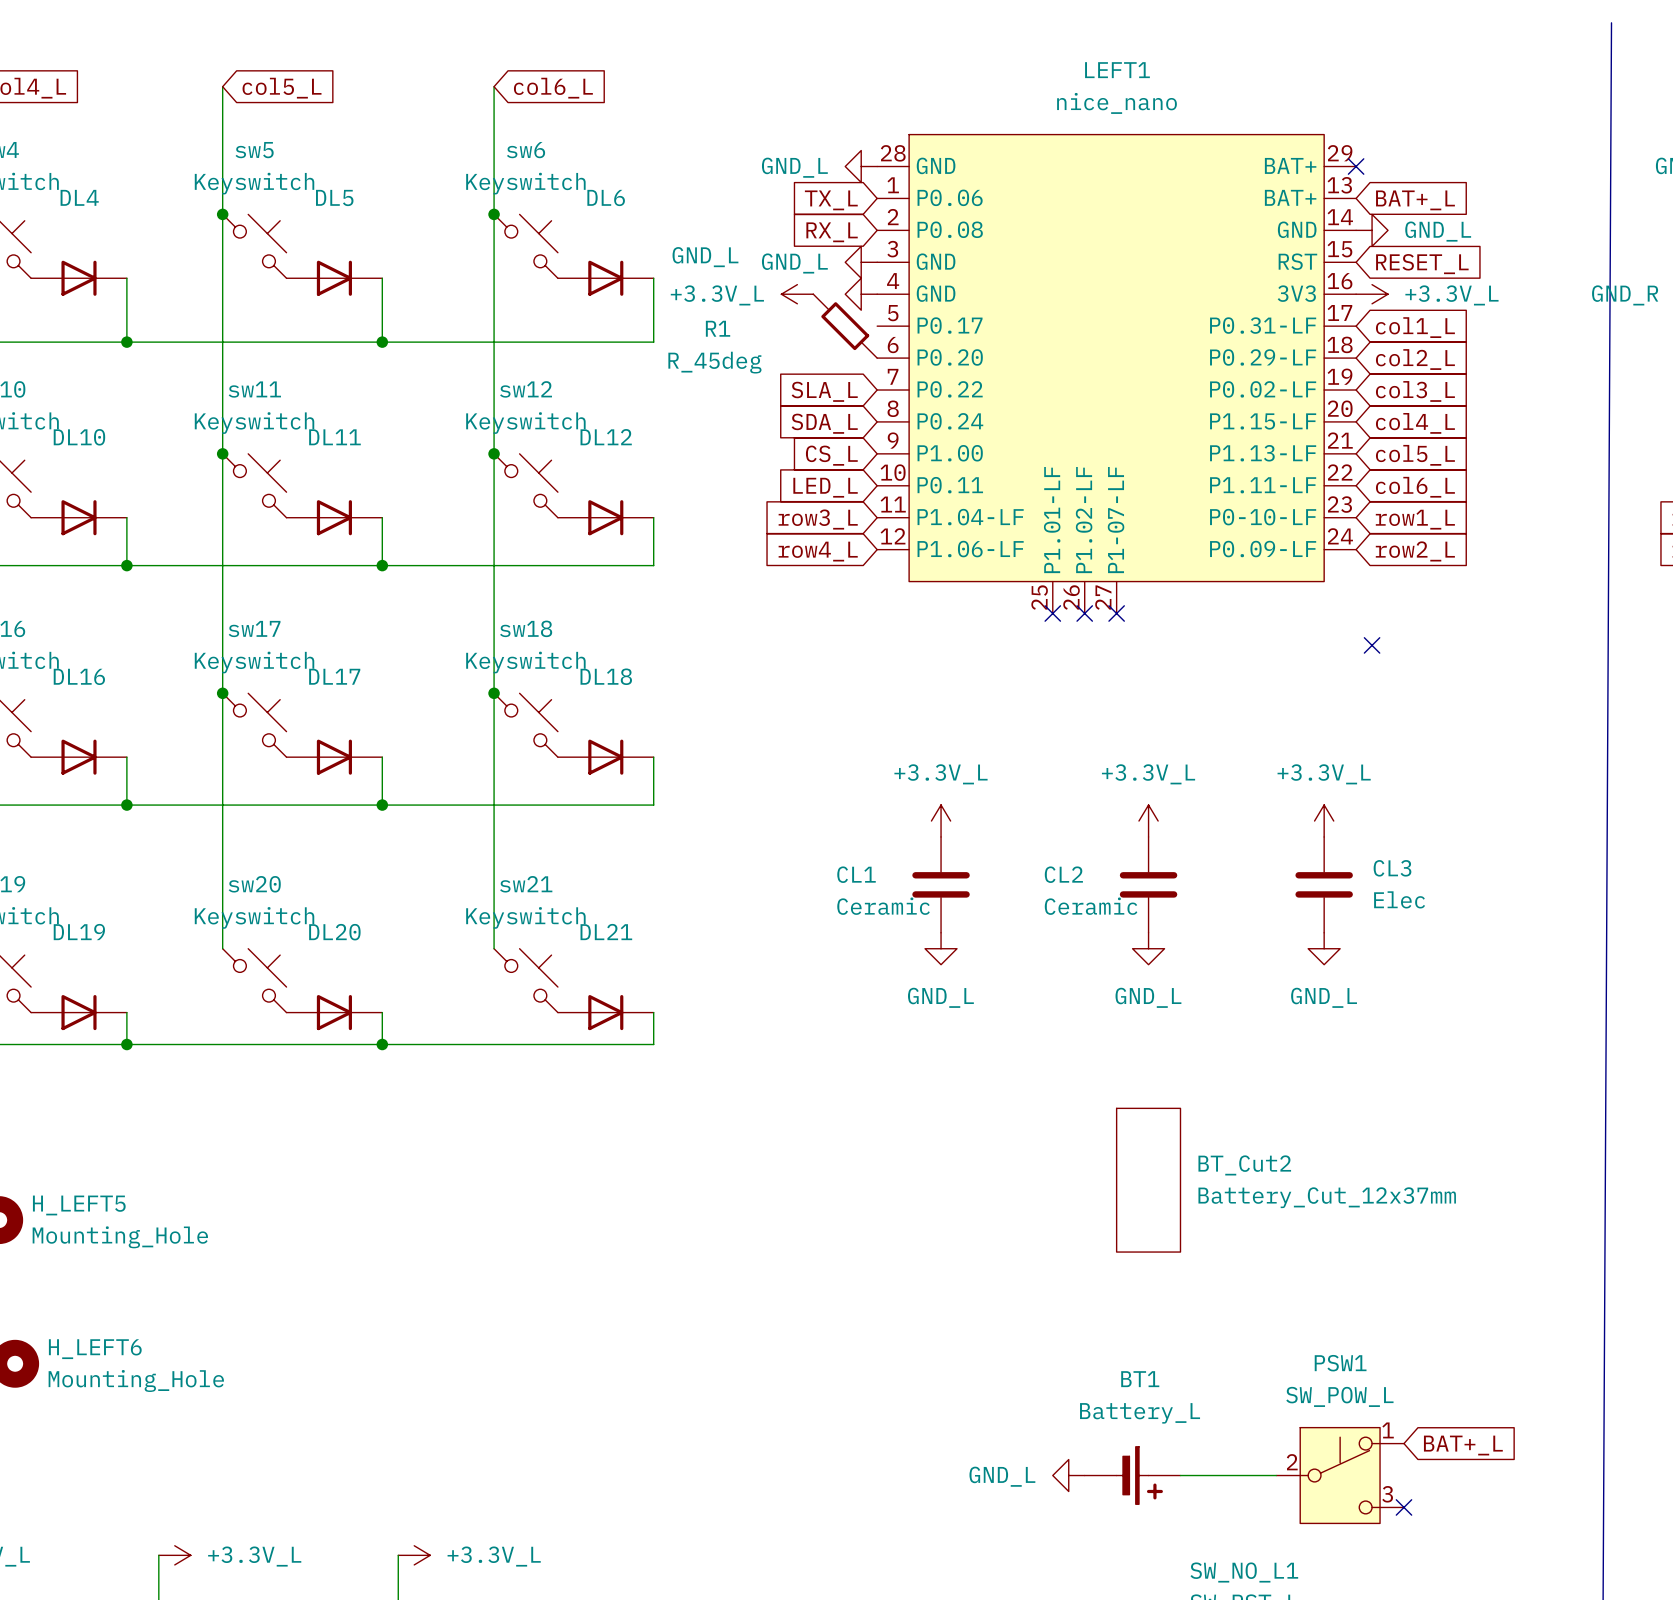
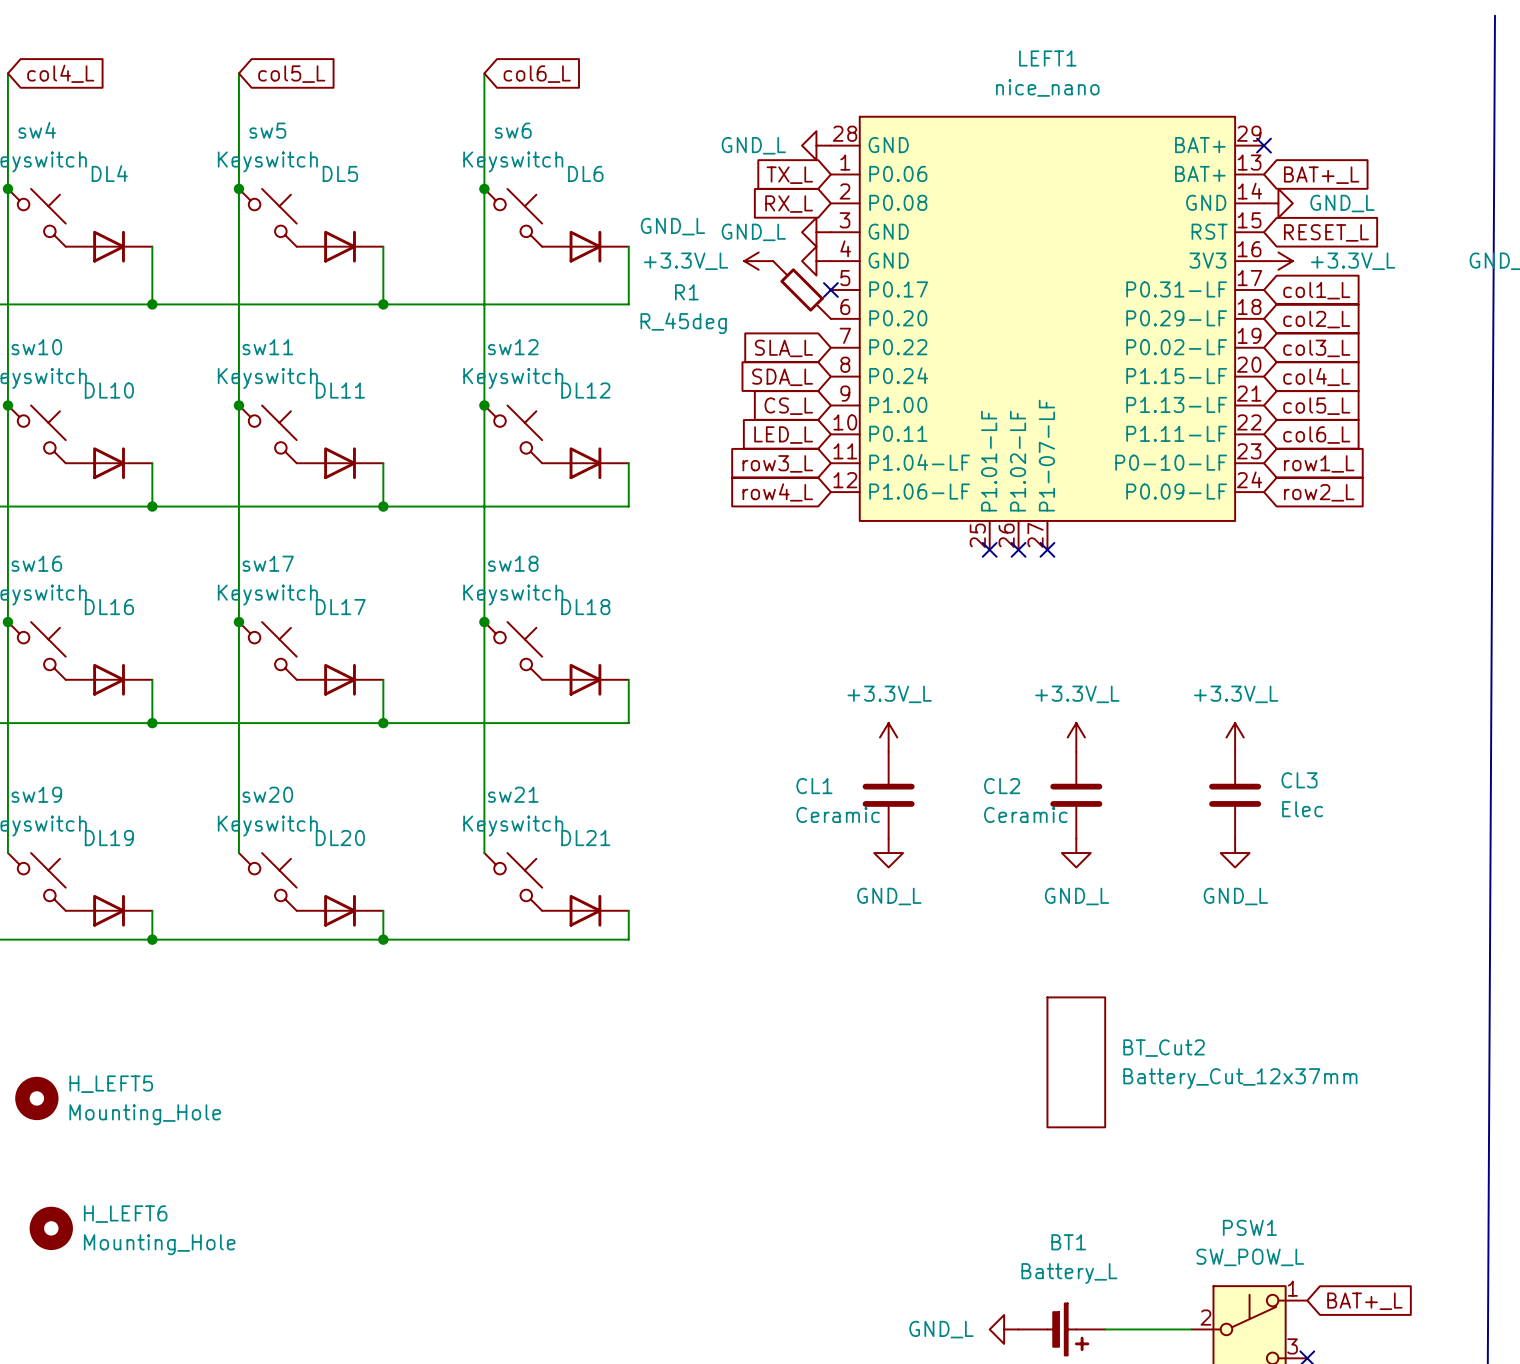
no-connect mark: none -> (830, 289)
no-connect mark: (1372, 645) -> none

